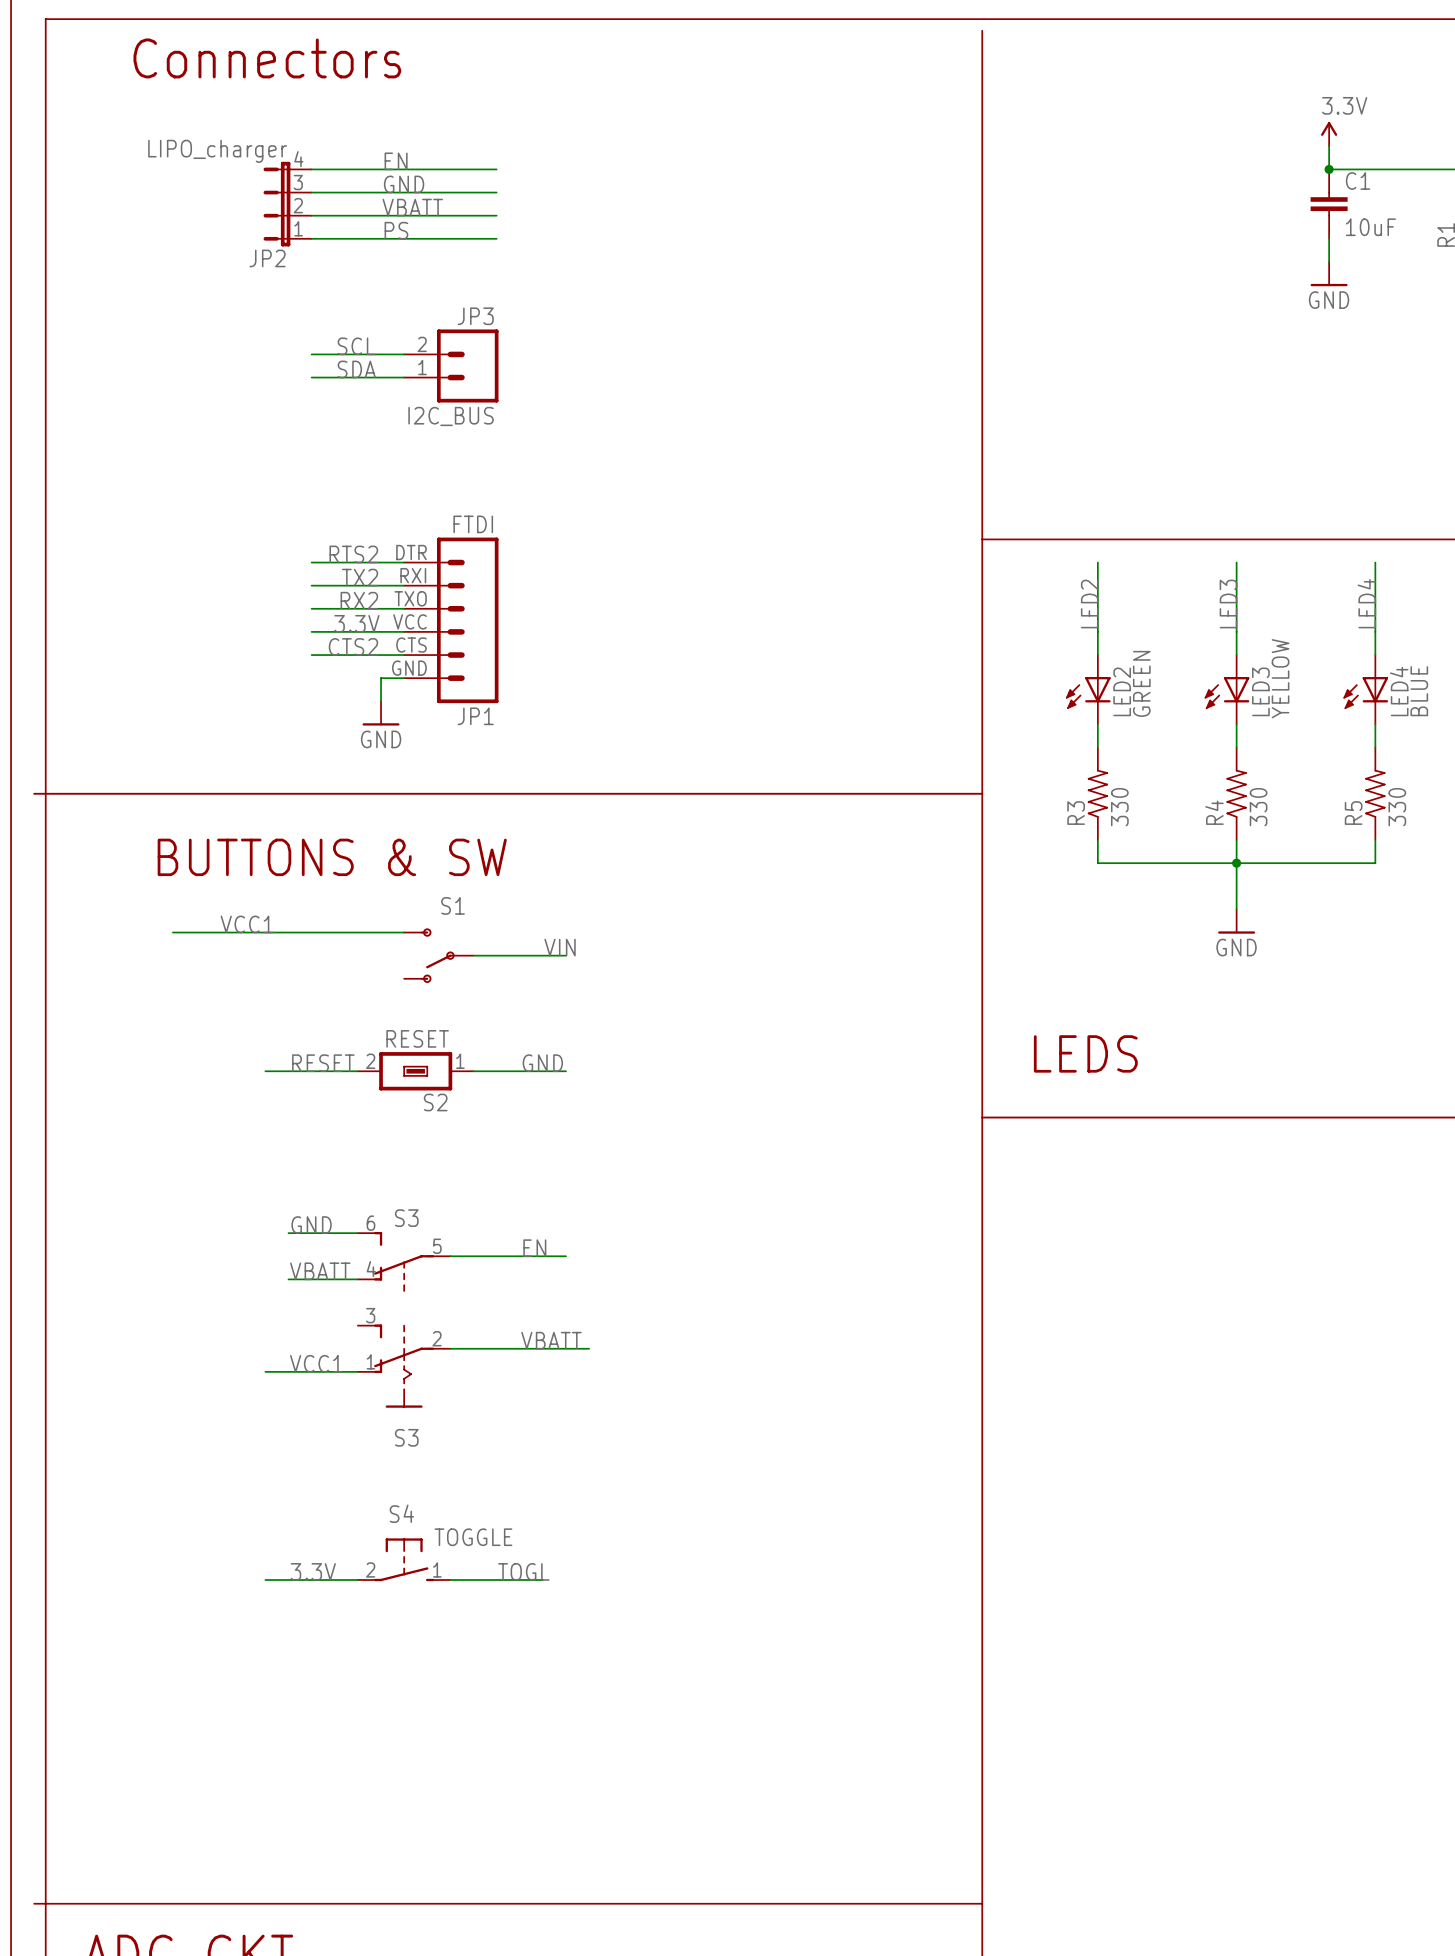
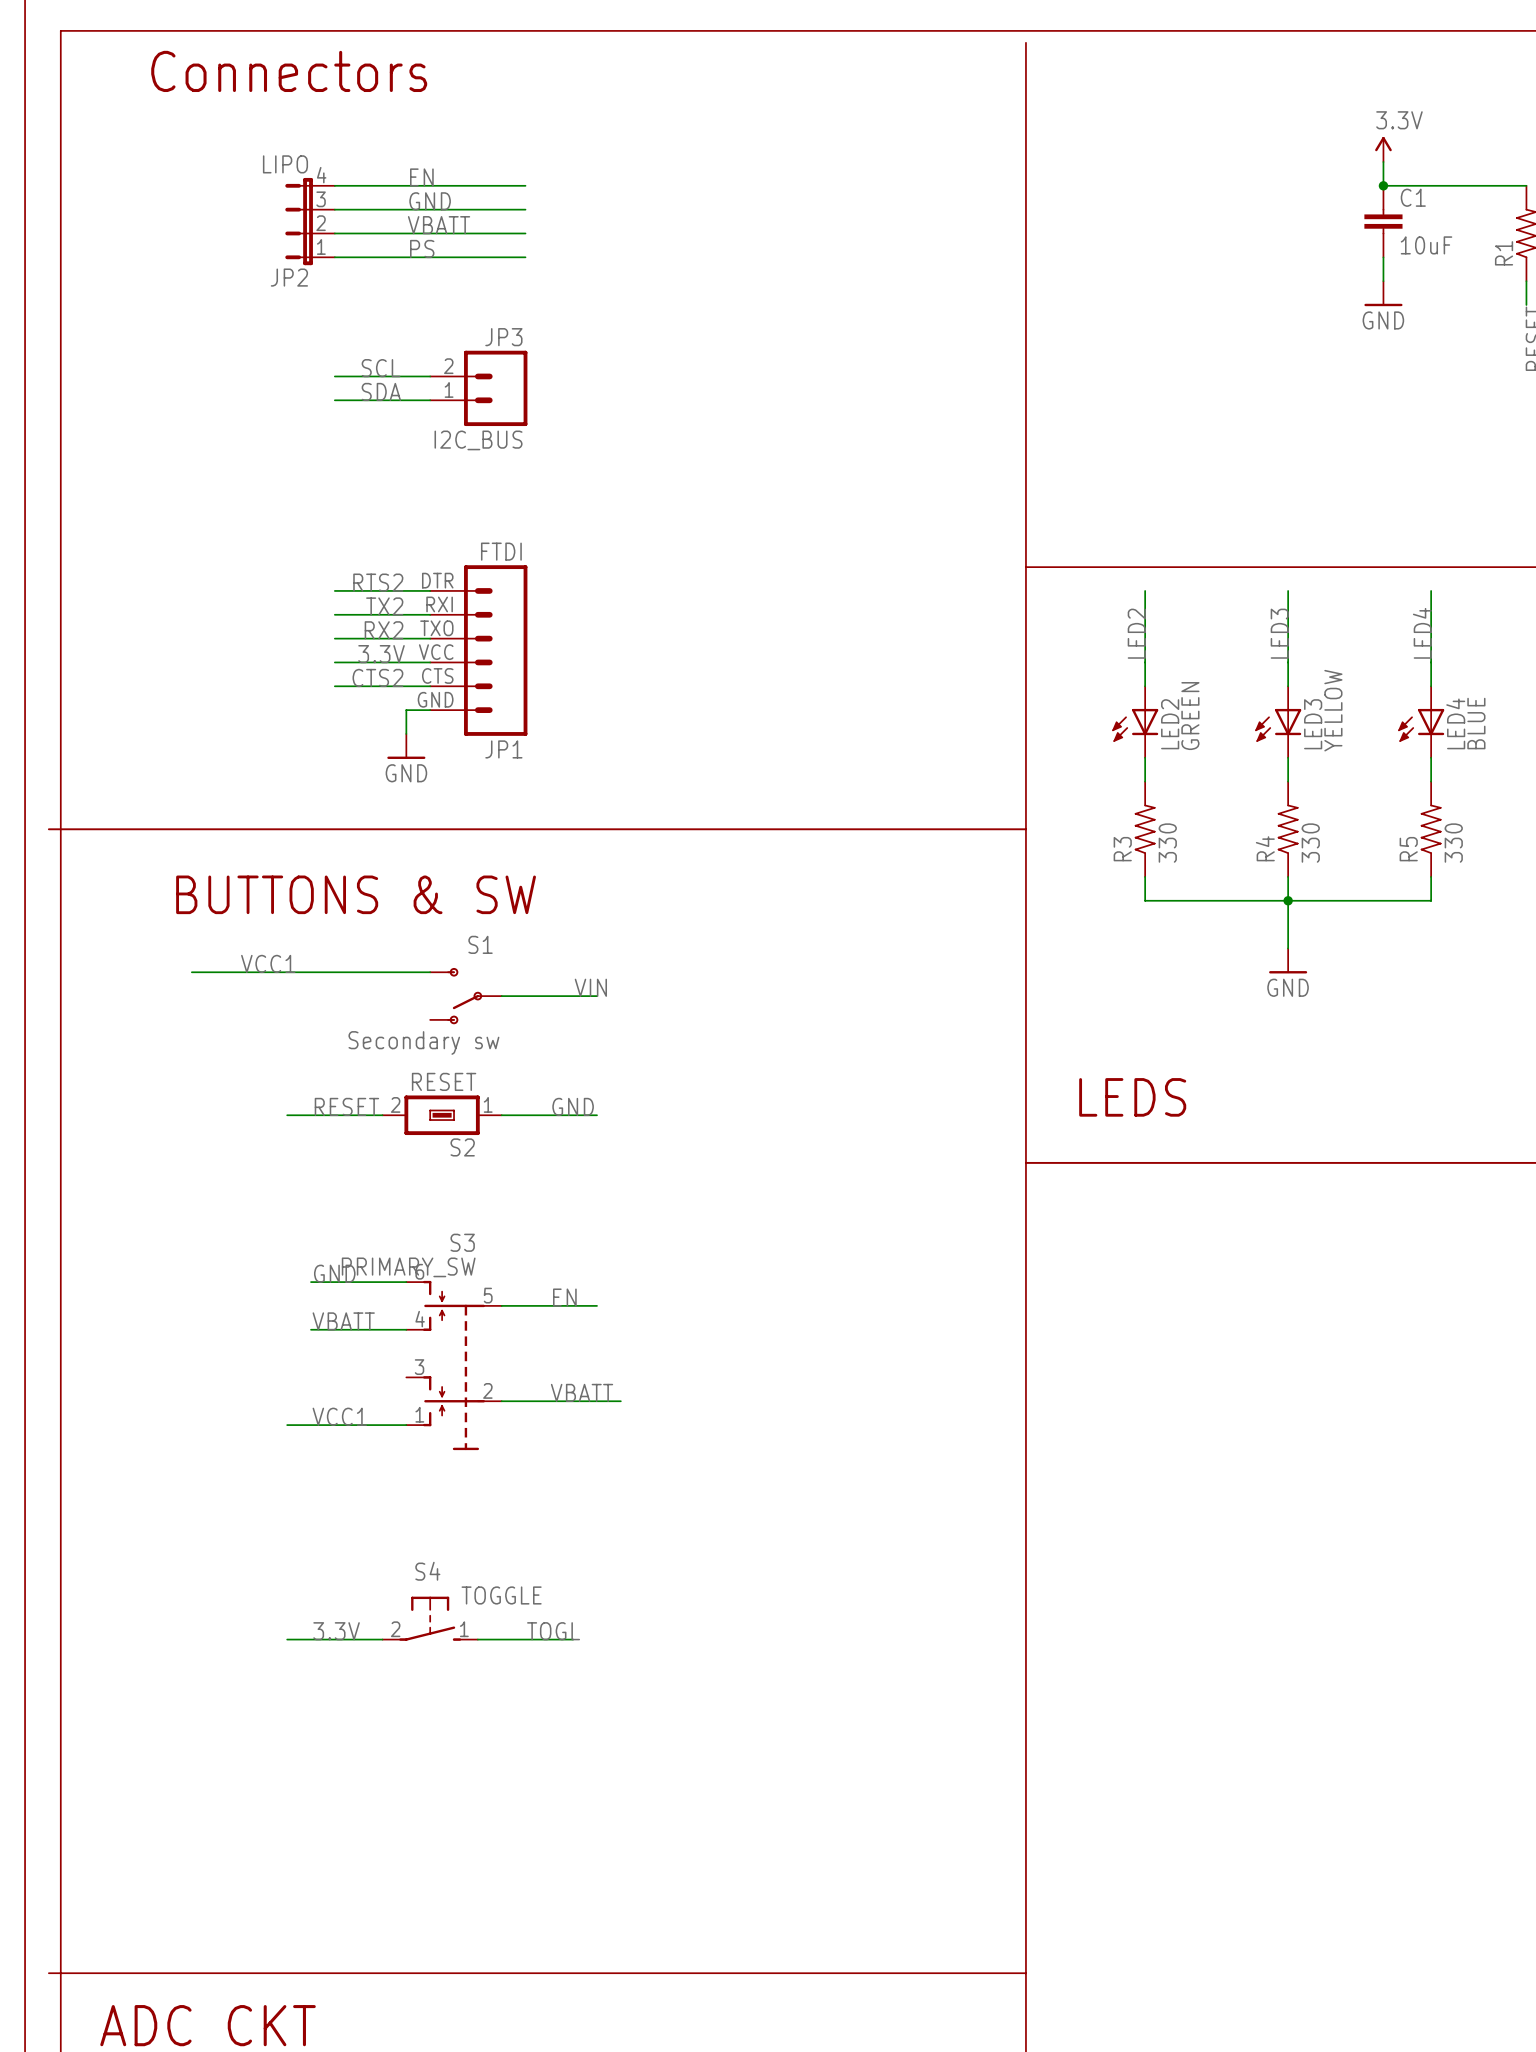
JP2 value: LIPO_charger (217, 151) -> LIPO (285, 164)
S1 value: none -> Secondary sw (423, 1042)
S3: (404, 1261) -> none
PRIMARY_SW: none -> S3 (454, 1365)
S3: (404, 1366) -> none

